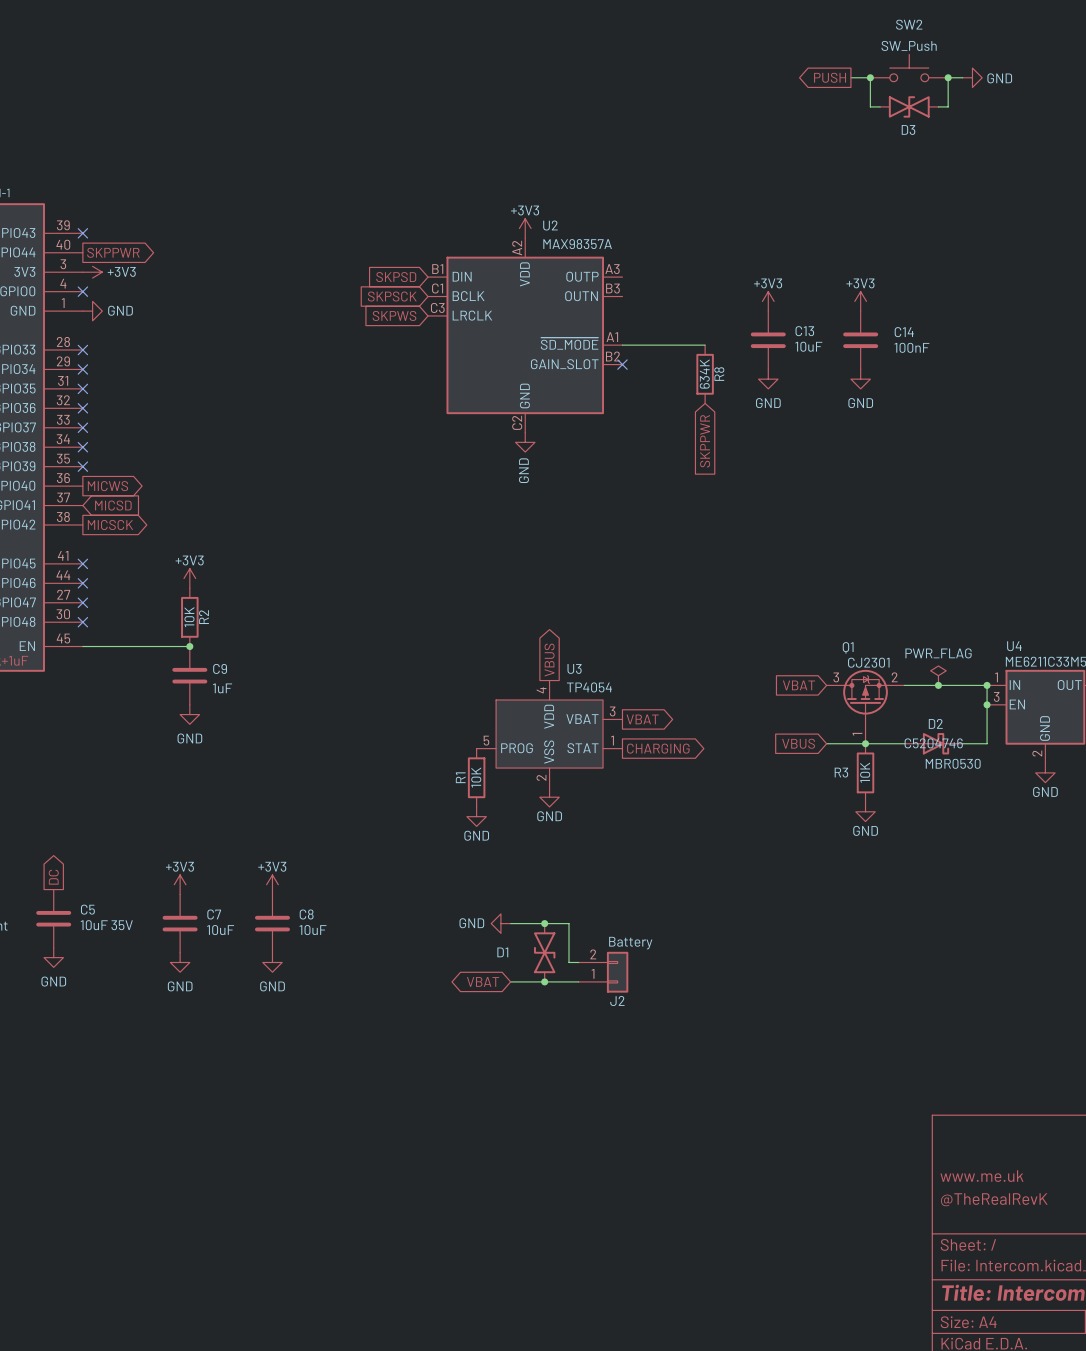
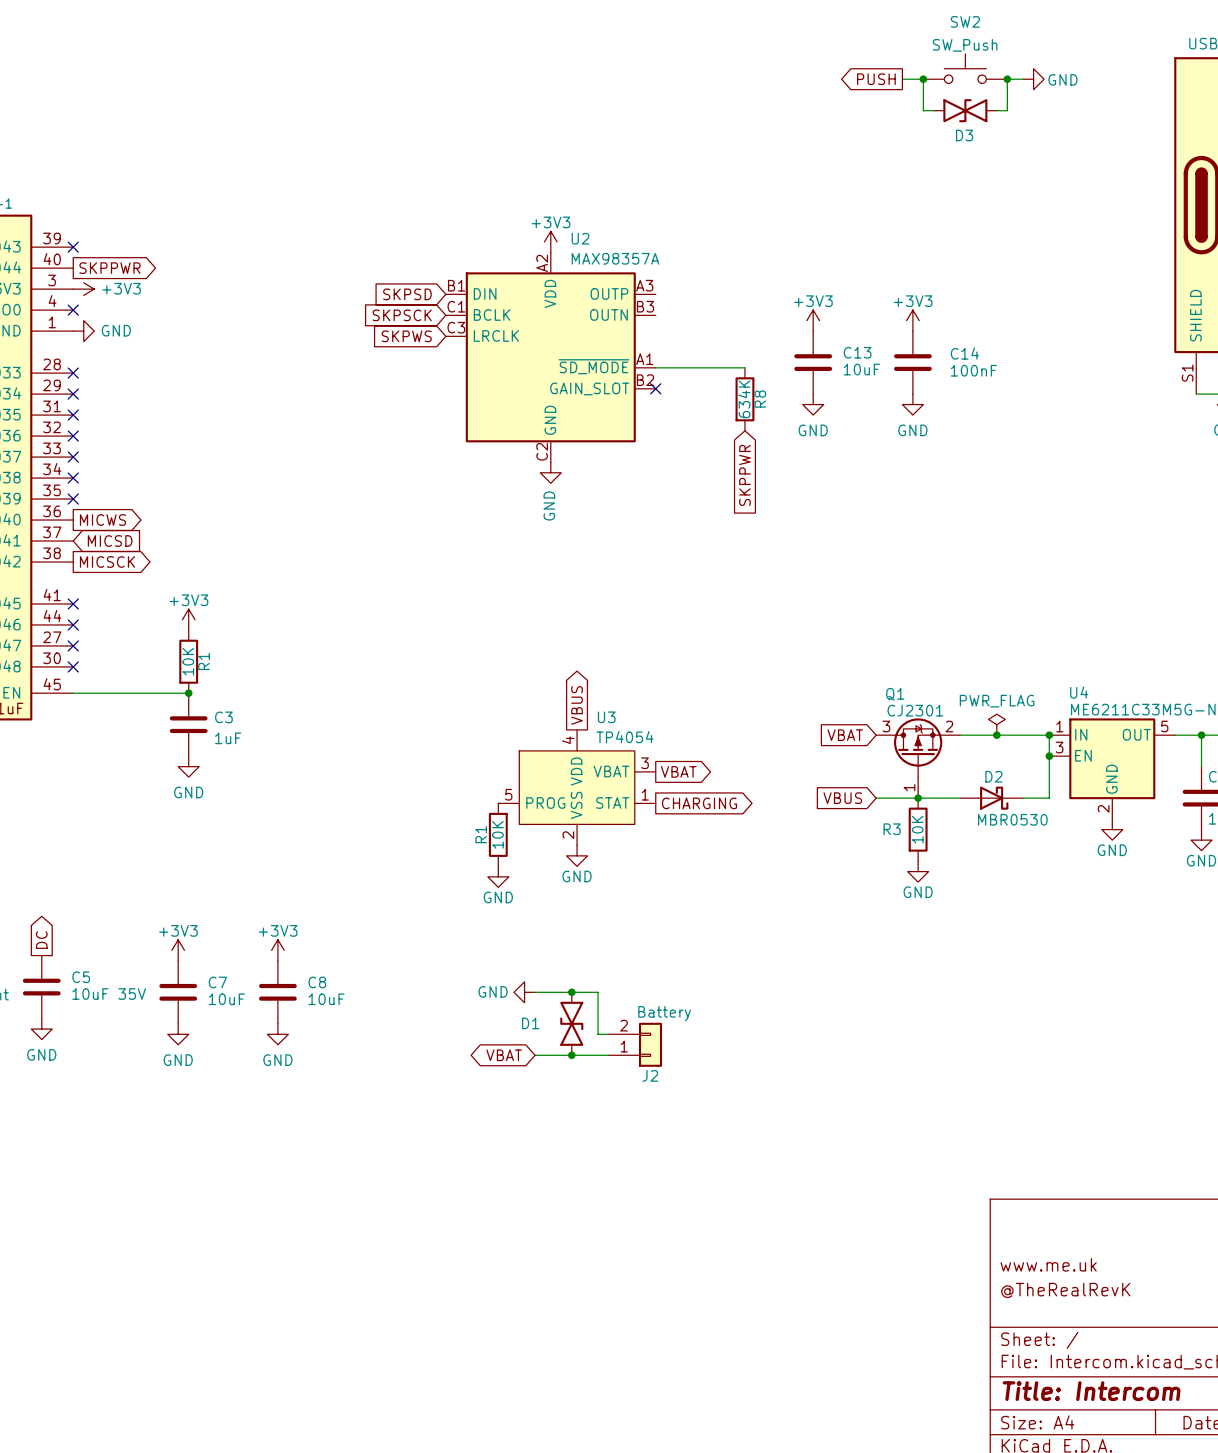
R2 name: R2 (203, 617) -> R1 (204, 661)
C9 name: C9 (220, 668) -> C3 (223, 717)
D2 text: C5204746 (933, 743) -> none

